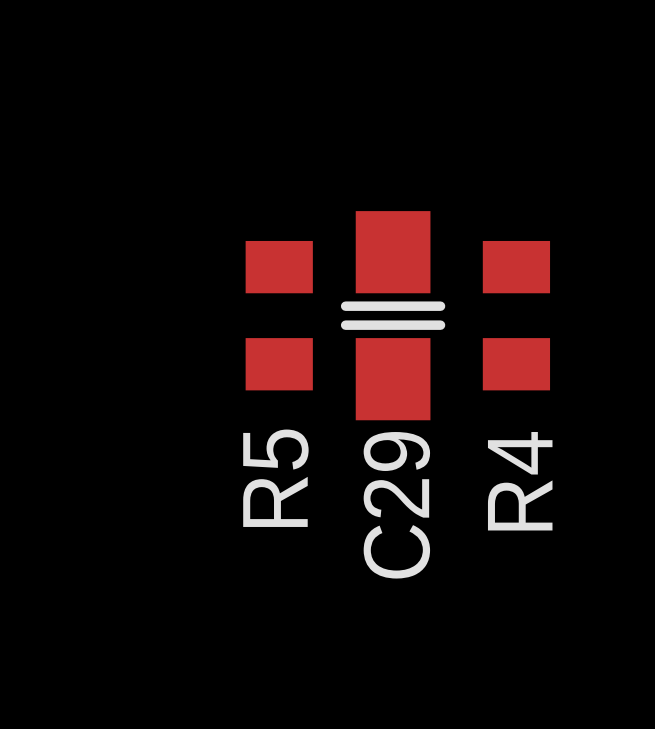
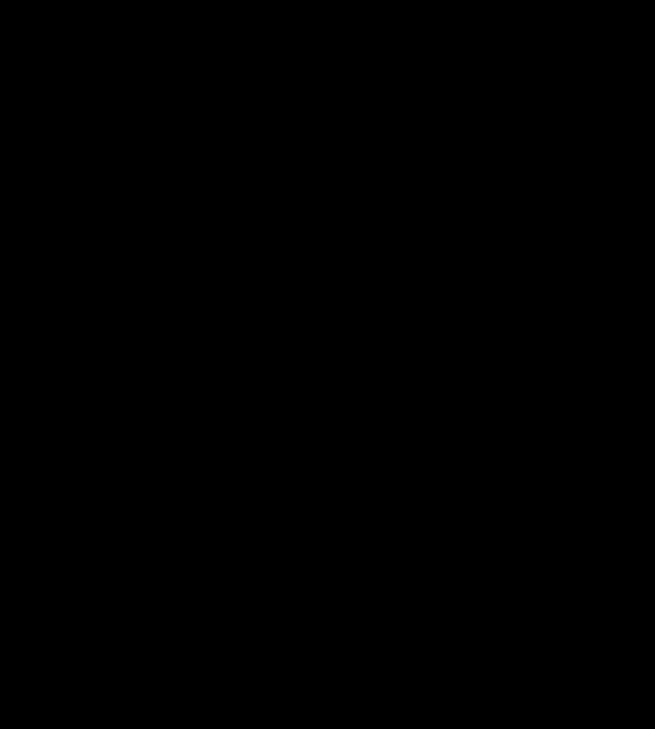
R5: (279, 315) -> none
C29: (393, 315) -> none
R4: (516, 315) -> none

